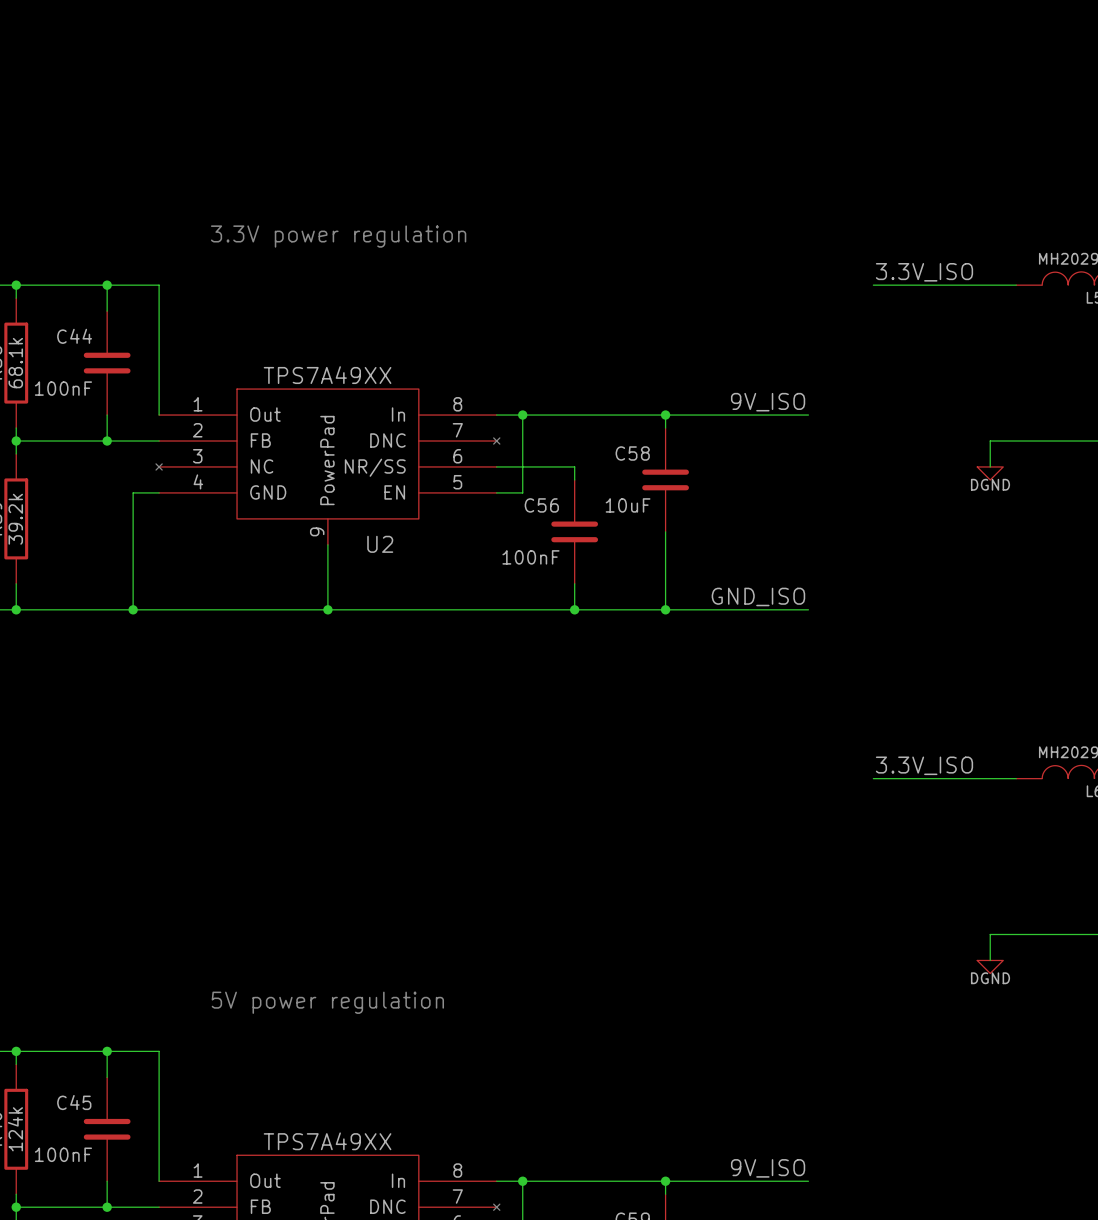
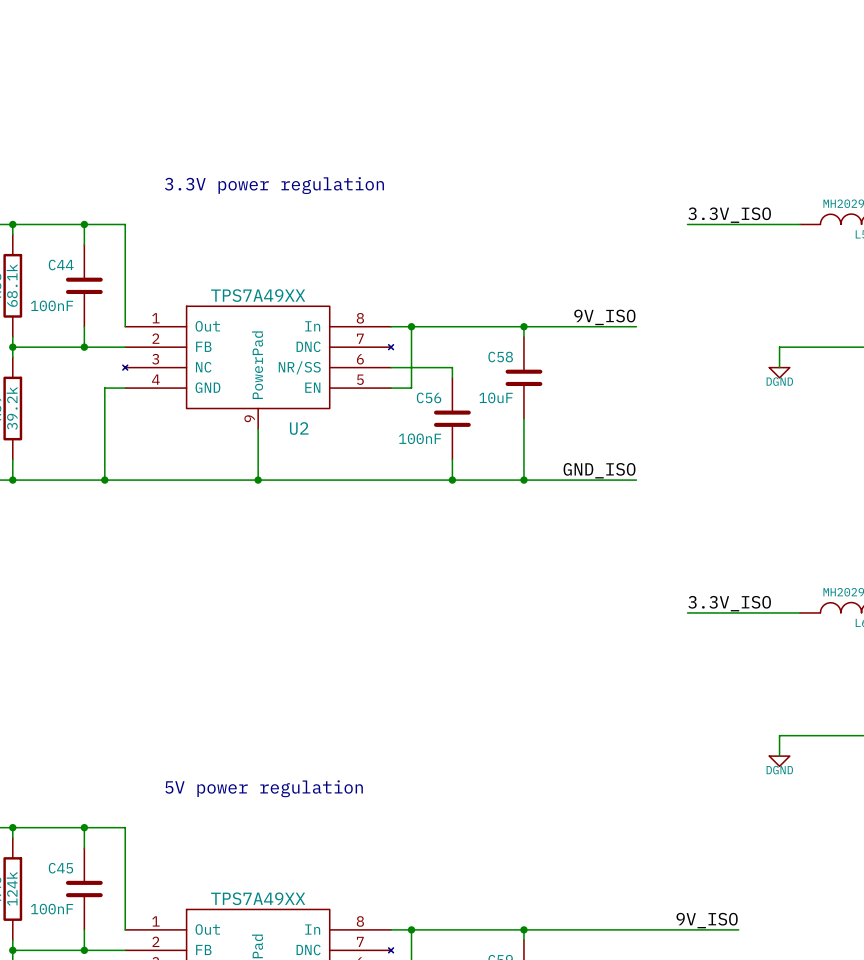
label position: 9V_ISO (768, 1168) -> 9V_ISO (707, 920)
wire: none -> (636, 929) (738, 929)

